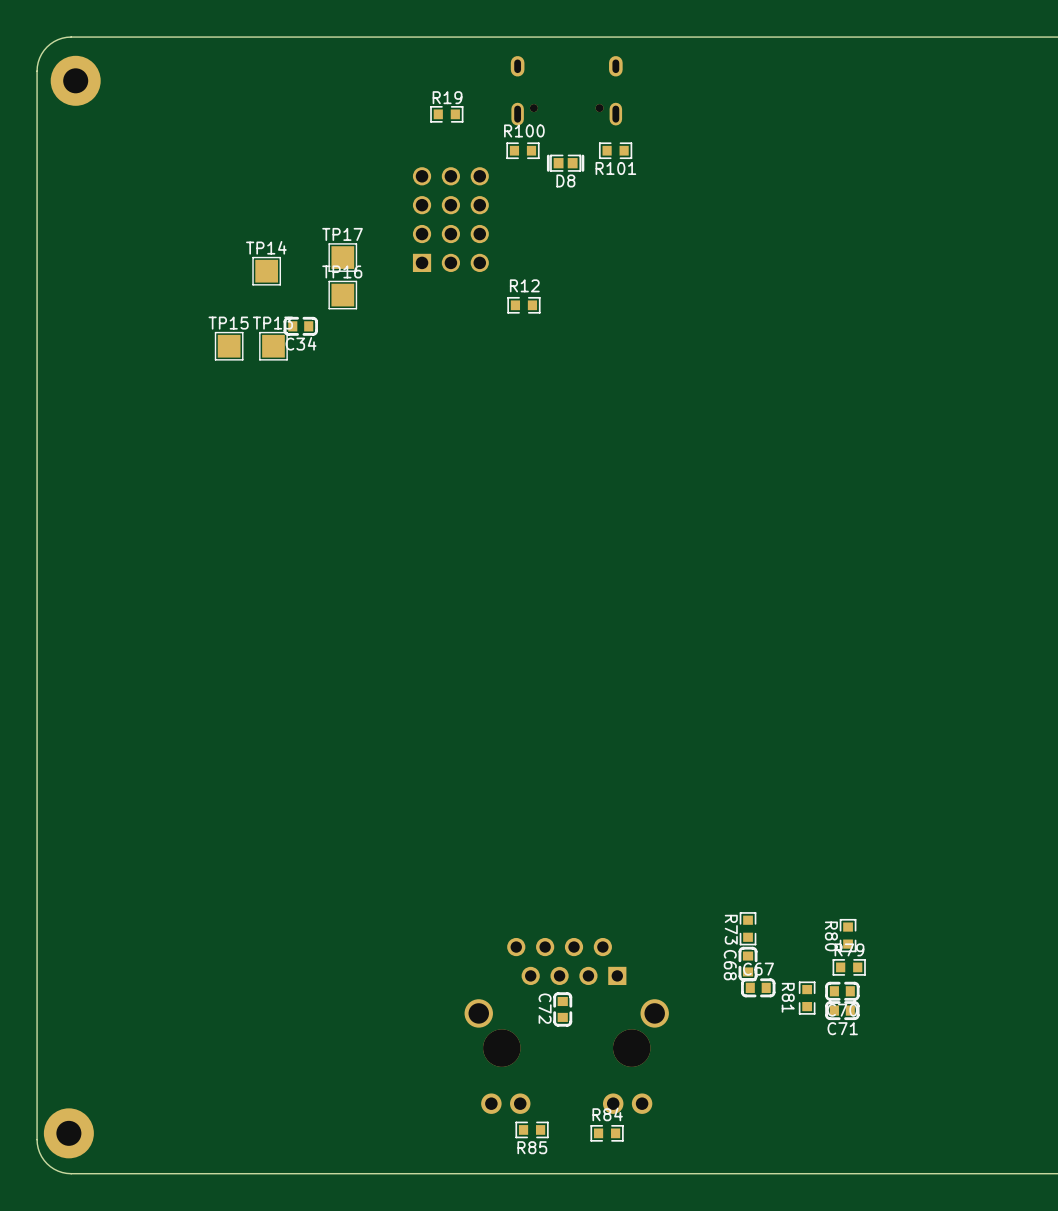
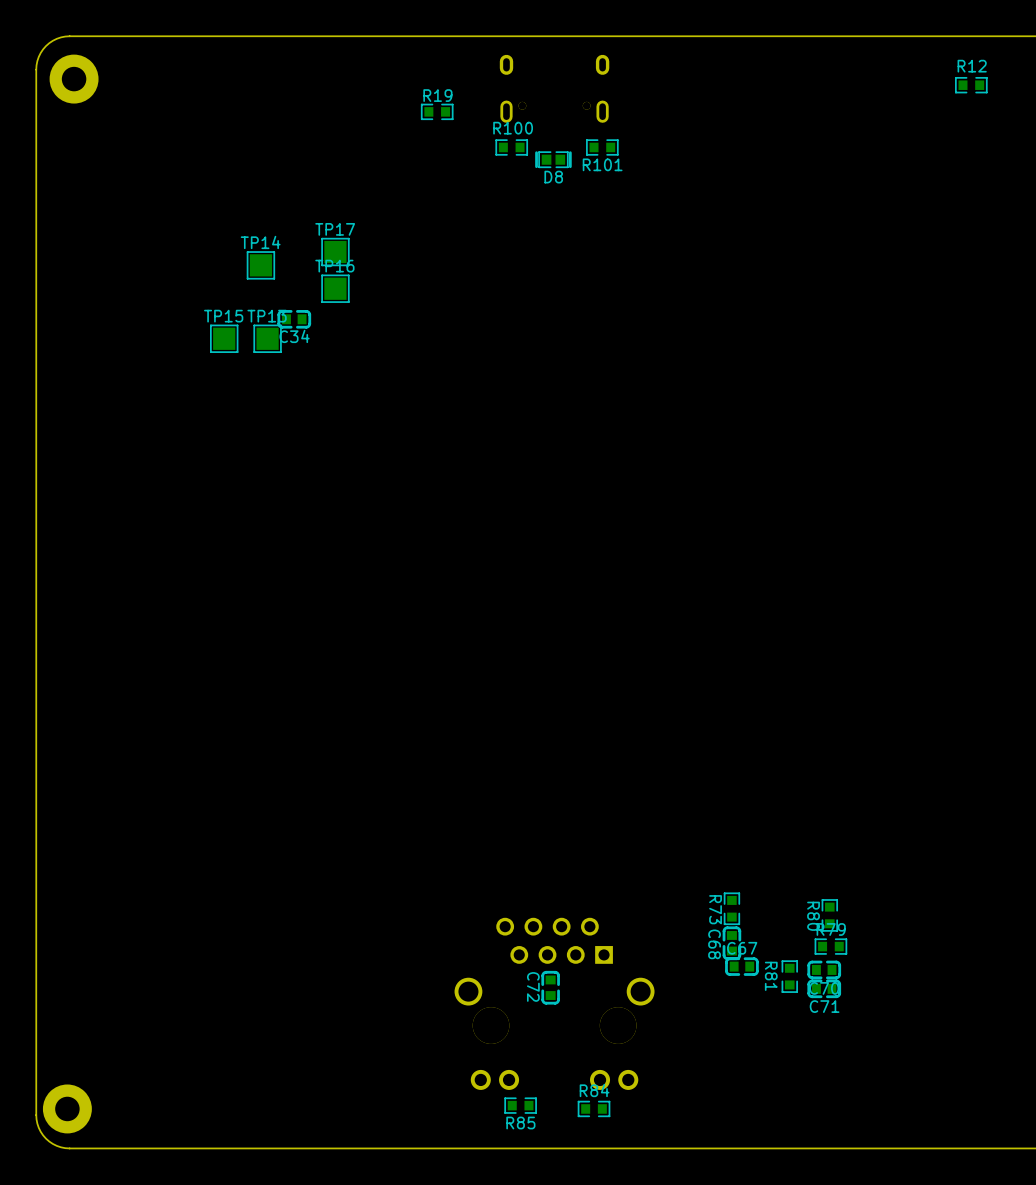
part: (450, 219) -> none
R12 position: (523, 305) -> (971, 85)

